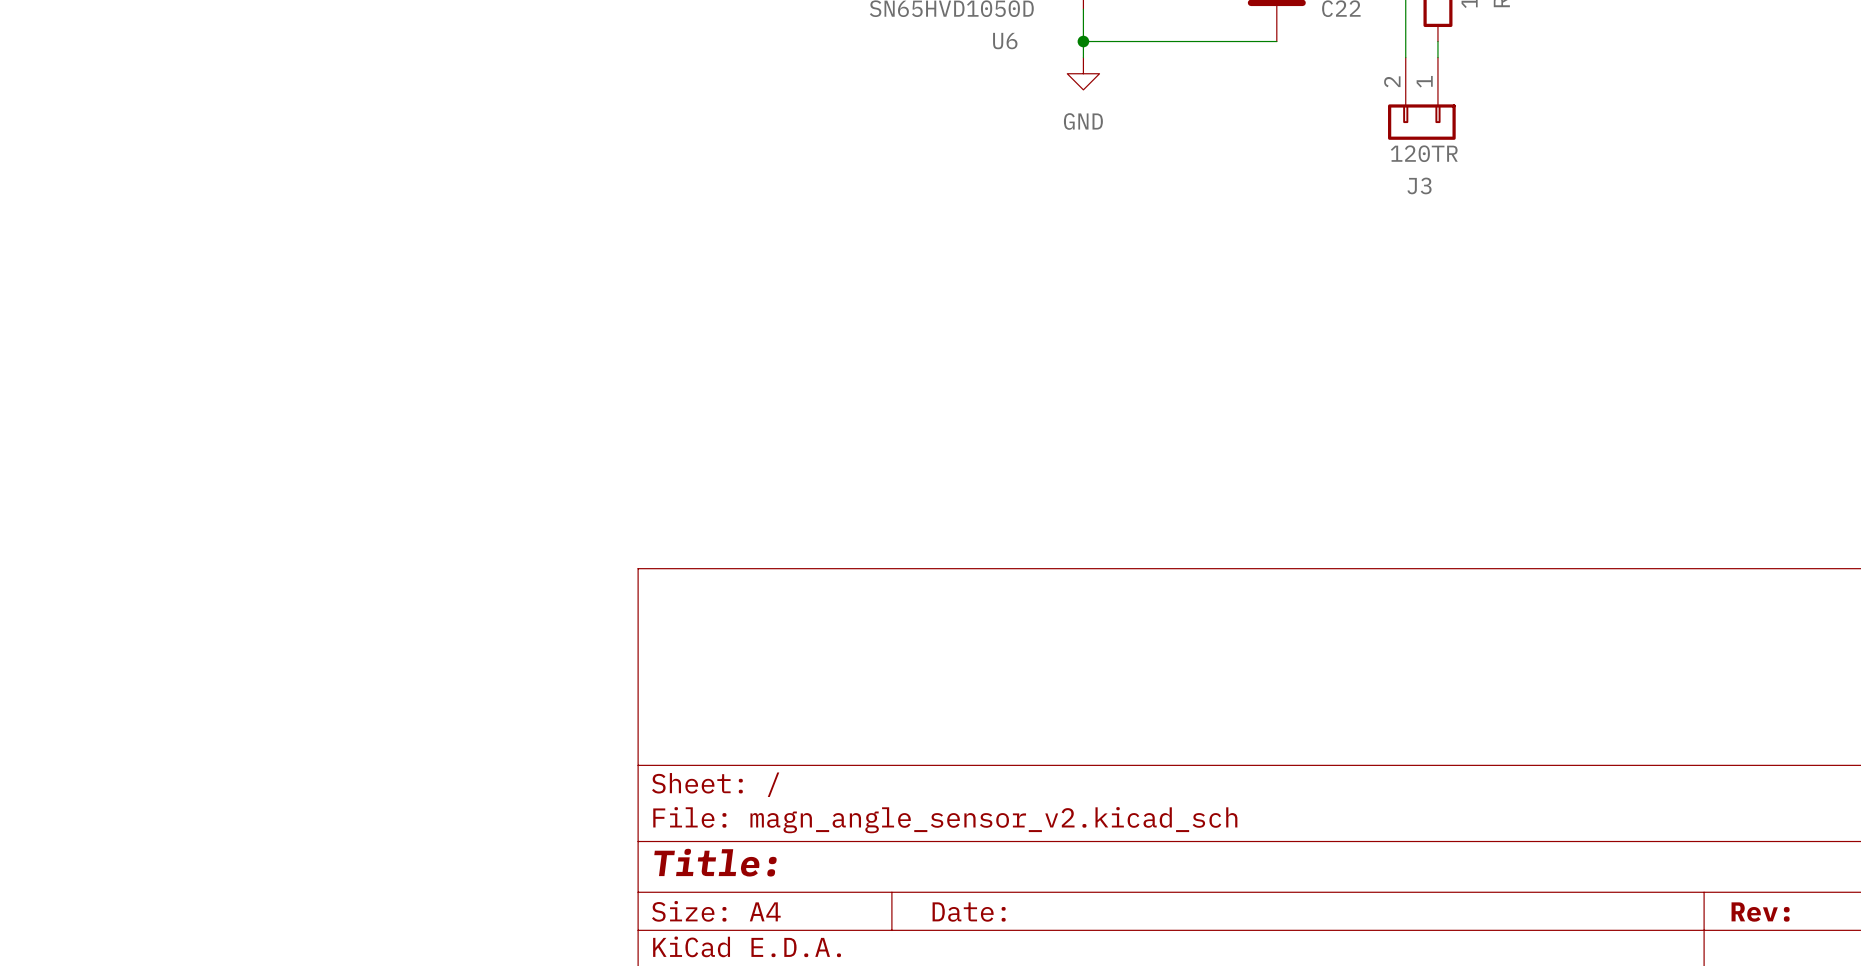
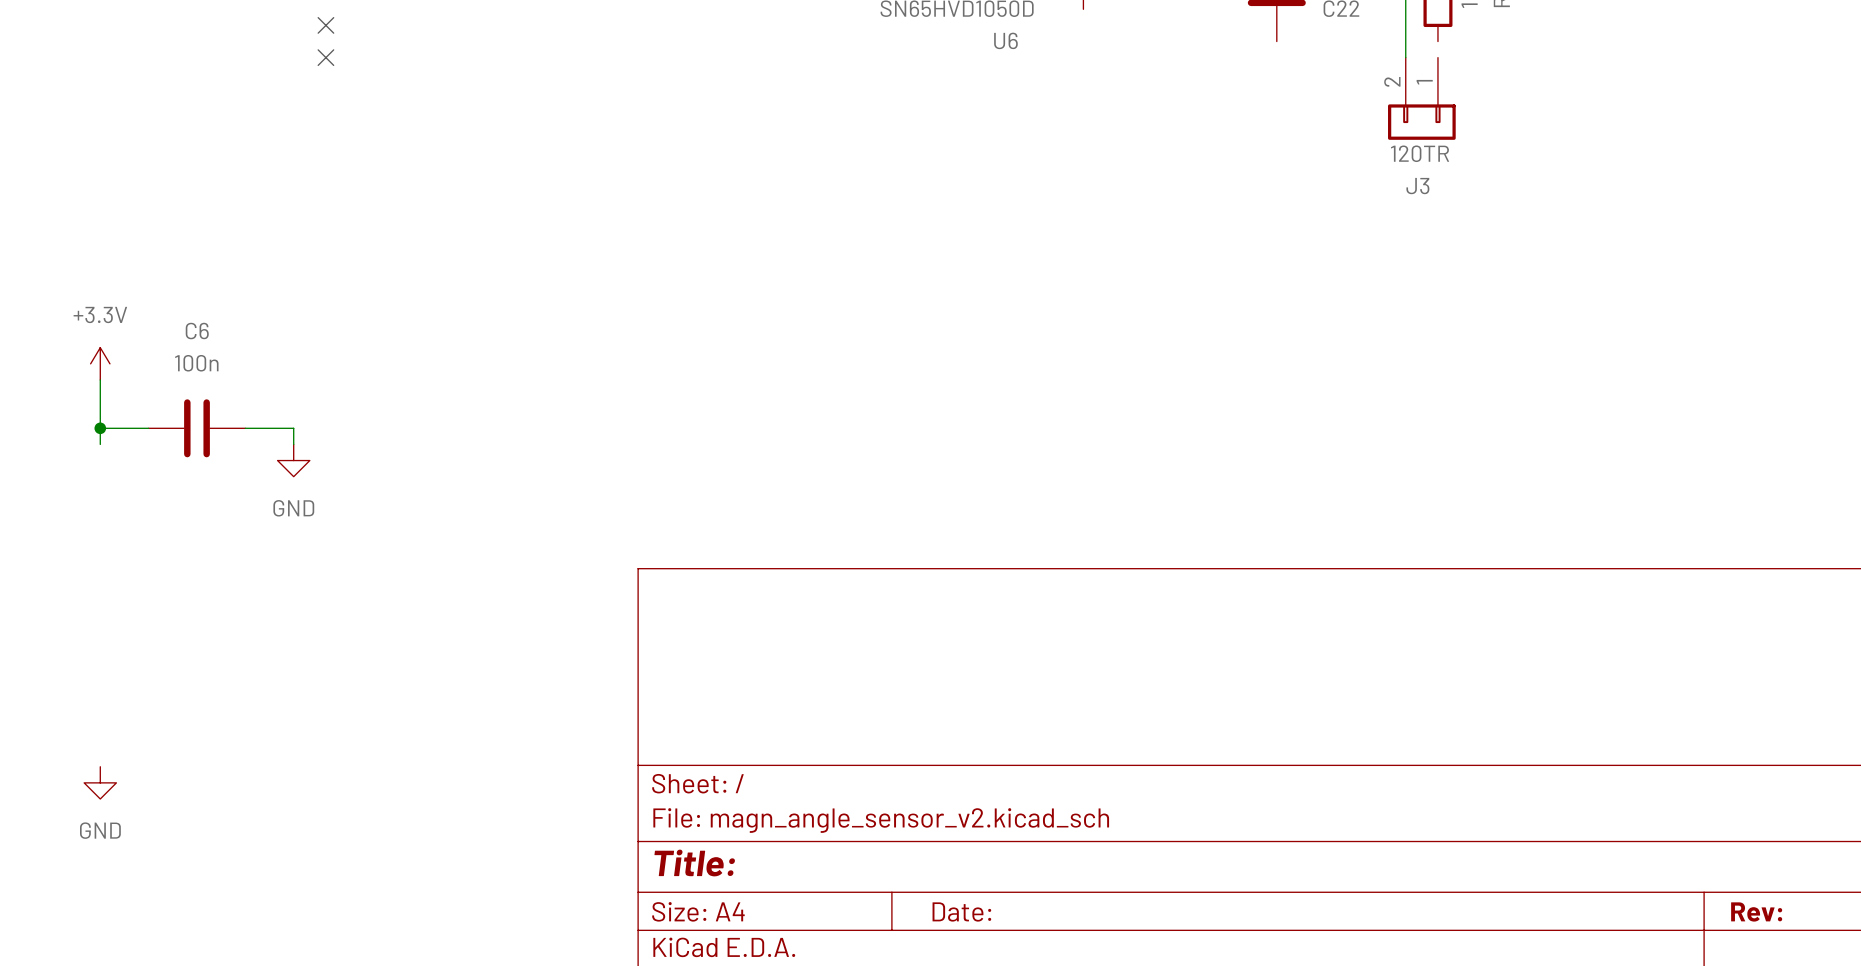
wire: (1083, 9) (1083, 57) -> none
no-connect mark: none -> (325, 25)
wire: (1083, 41) (1276, 41) -> none
junction: (1083, 41) -> none
wire: (1437, 41) (1437, 57) -> none
no-connect mark: none -> (325, 57)
power symbol: GND (1083, 73) -> none
power symbol: none -> +3.3V (100, 363)
wire: none -> (100, 379) (100, 444)
wire: none -> (100, 428) (148, 428)
junction: none -> (100, 428)
C6: none -> 100n (196, 428)
wire: none -> (245, 428) (293, 428) (293, 444)
power symbol: none -> GND (293, 460)
power symbol: none -> GND (100, 782)

